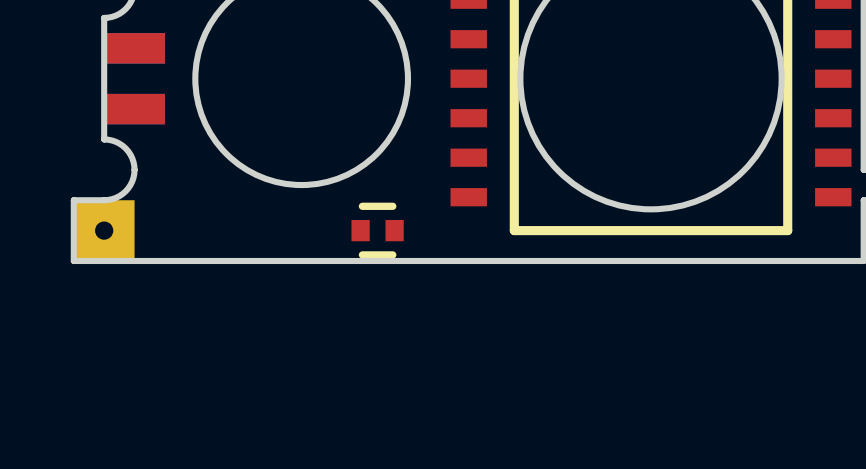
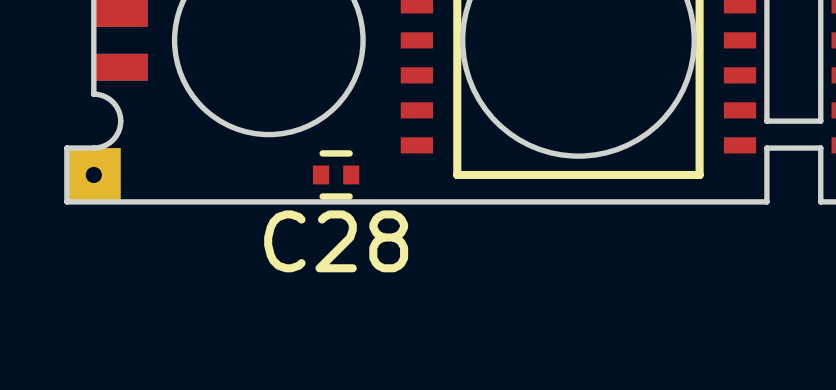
C28 name: none -> C28 (336, 241)

